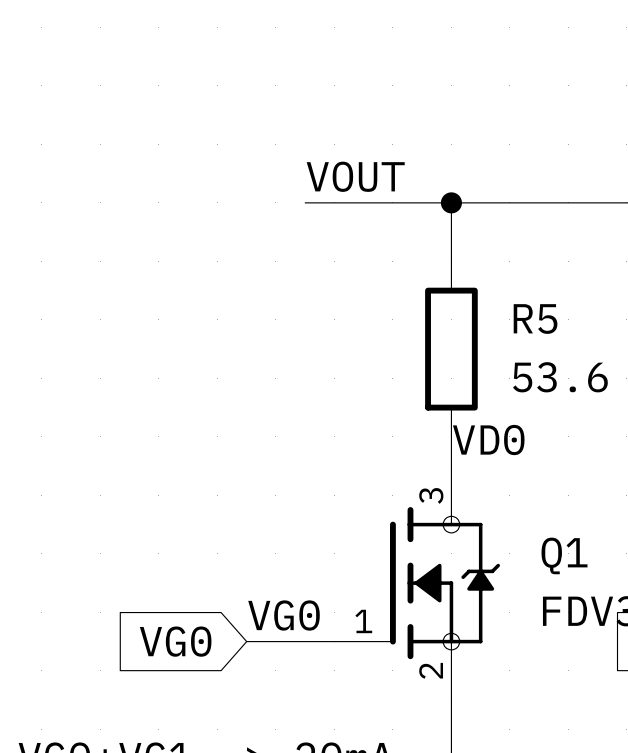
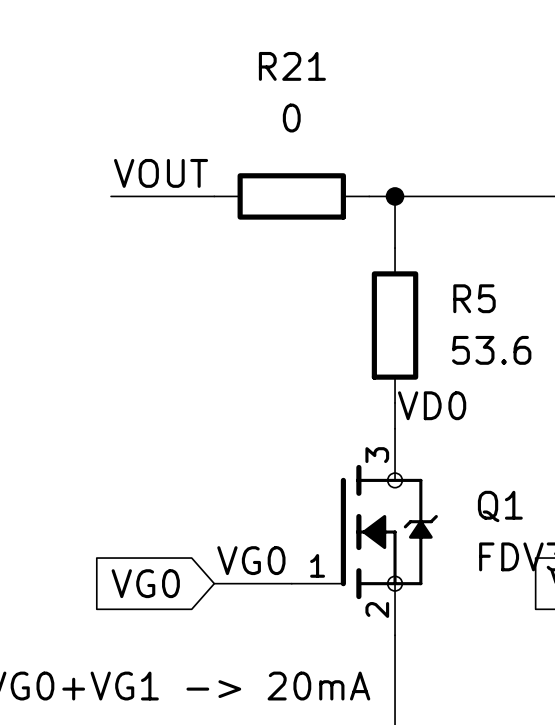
label position: VOUT (355, 176) -> VOUT (161, 173)
wire: (305, 202) (422, 202) -> (111, 196) (214, 196)
R21: none -> 0 (291, 196)

